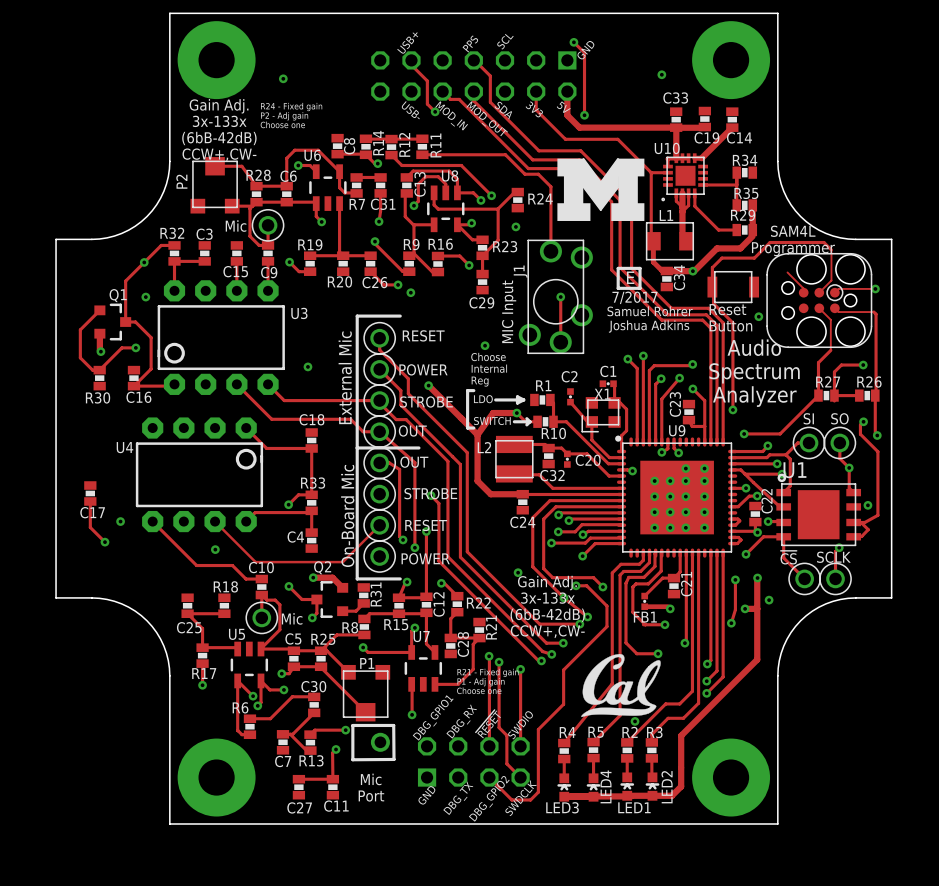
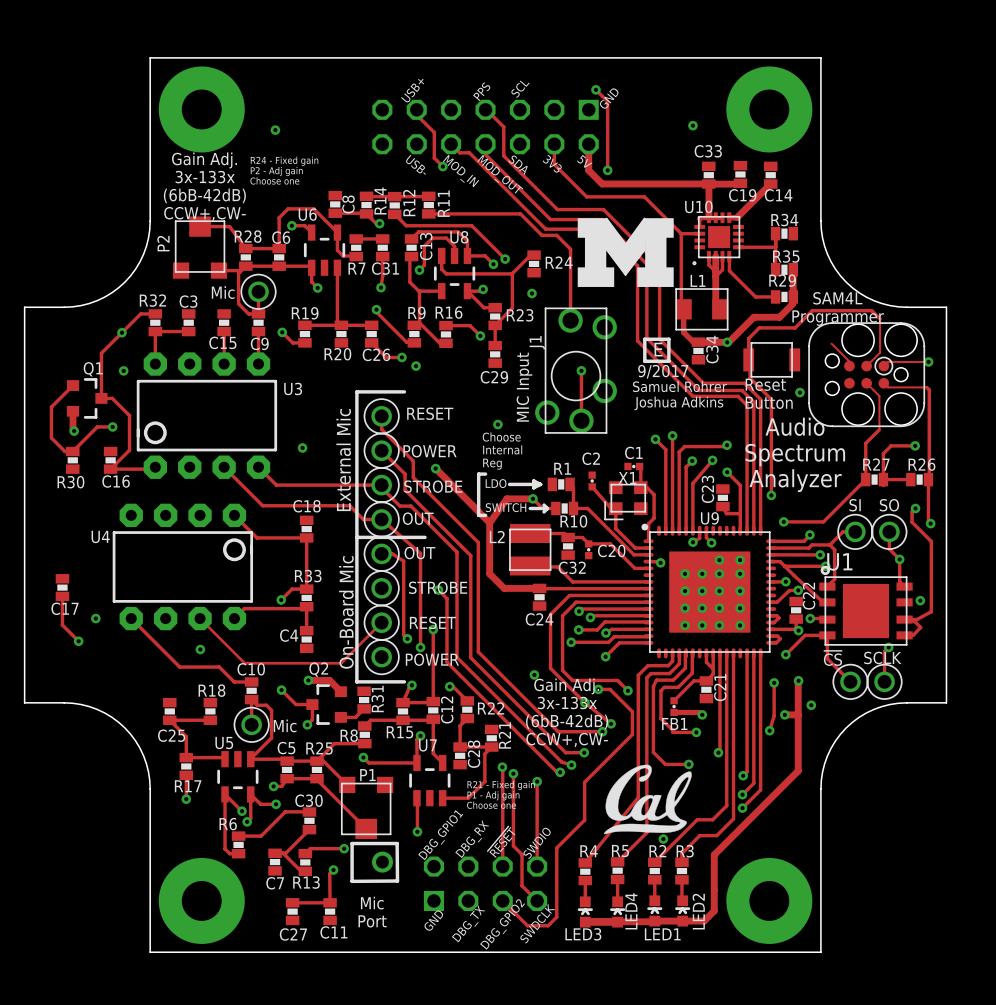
text: 7/2017 (635, 297) -> 9/2017 (663, 371)
track: none -> (706, 653) (706, 662) (713, 668)

